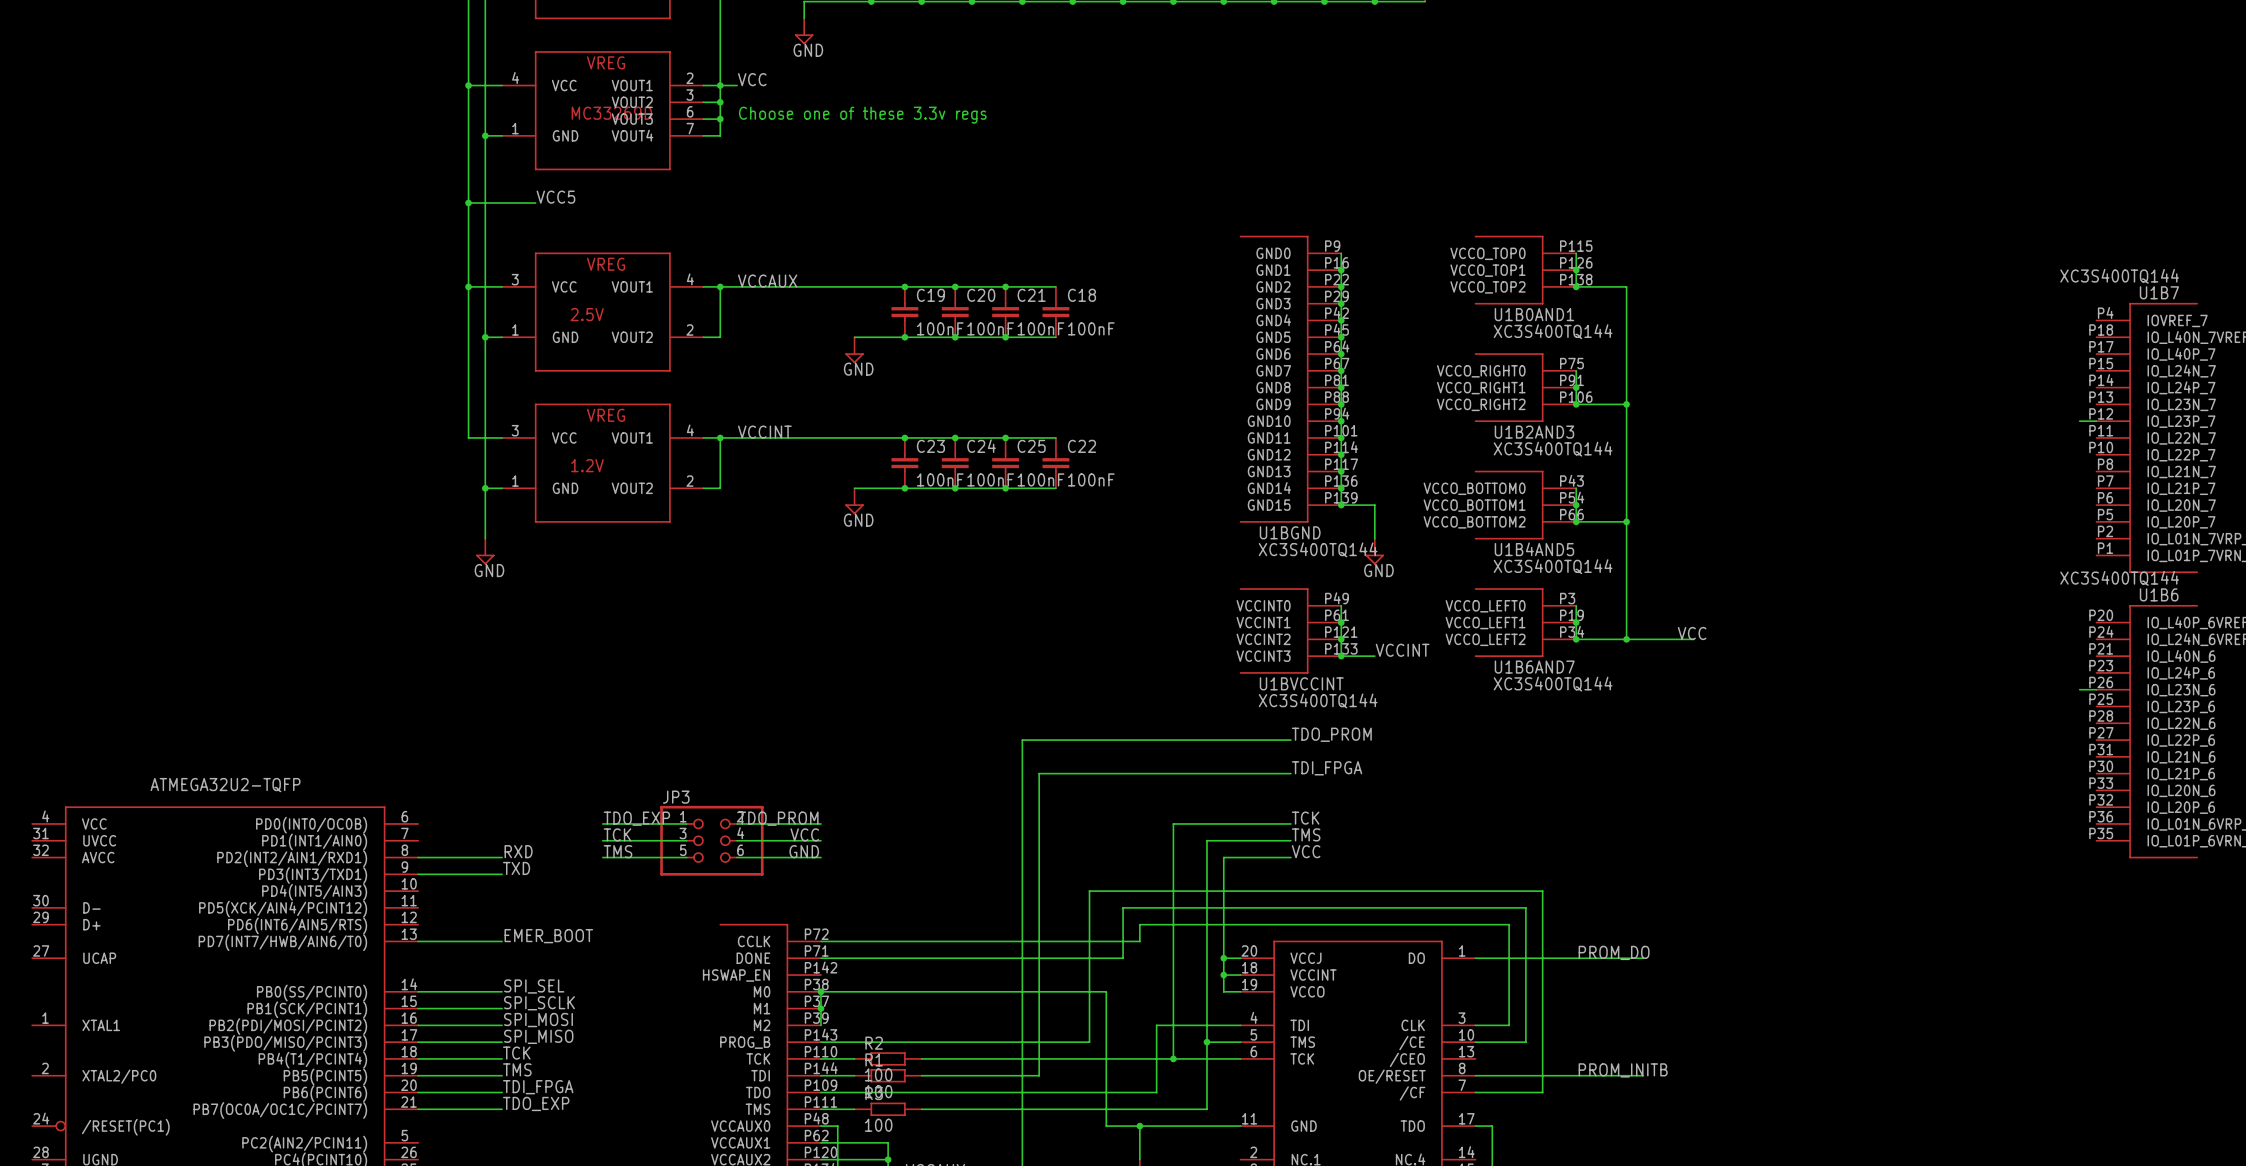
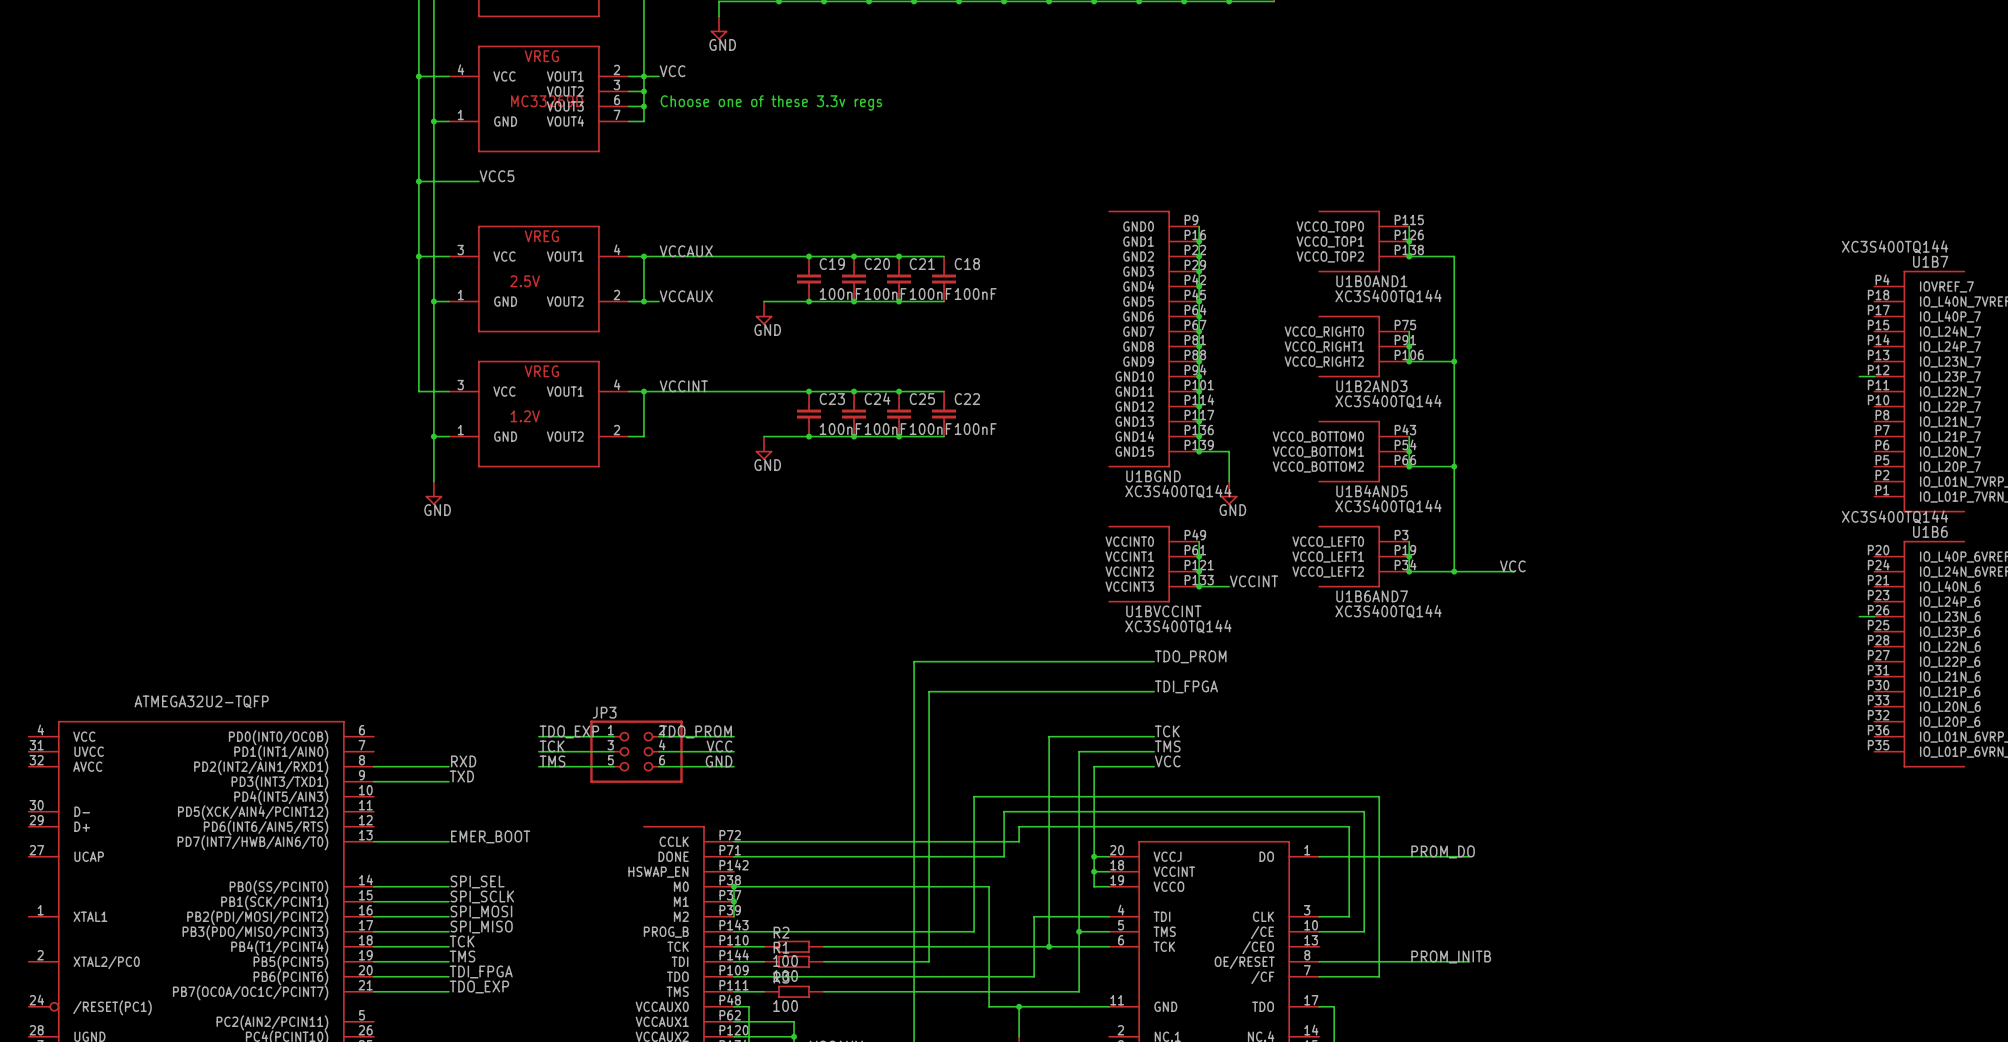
label: none -> VCCAUX (686, 296)
wire: none -> (643, 301) (658, 301)
junction: none -> (643, 301)

